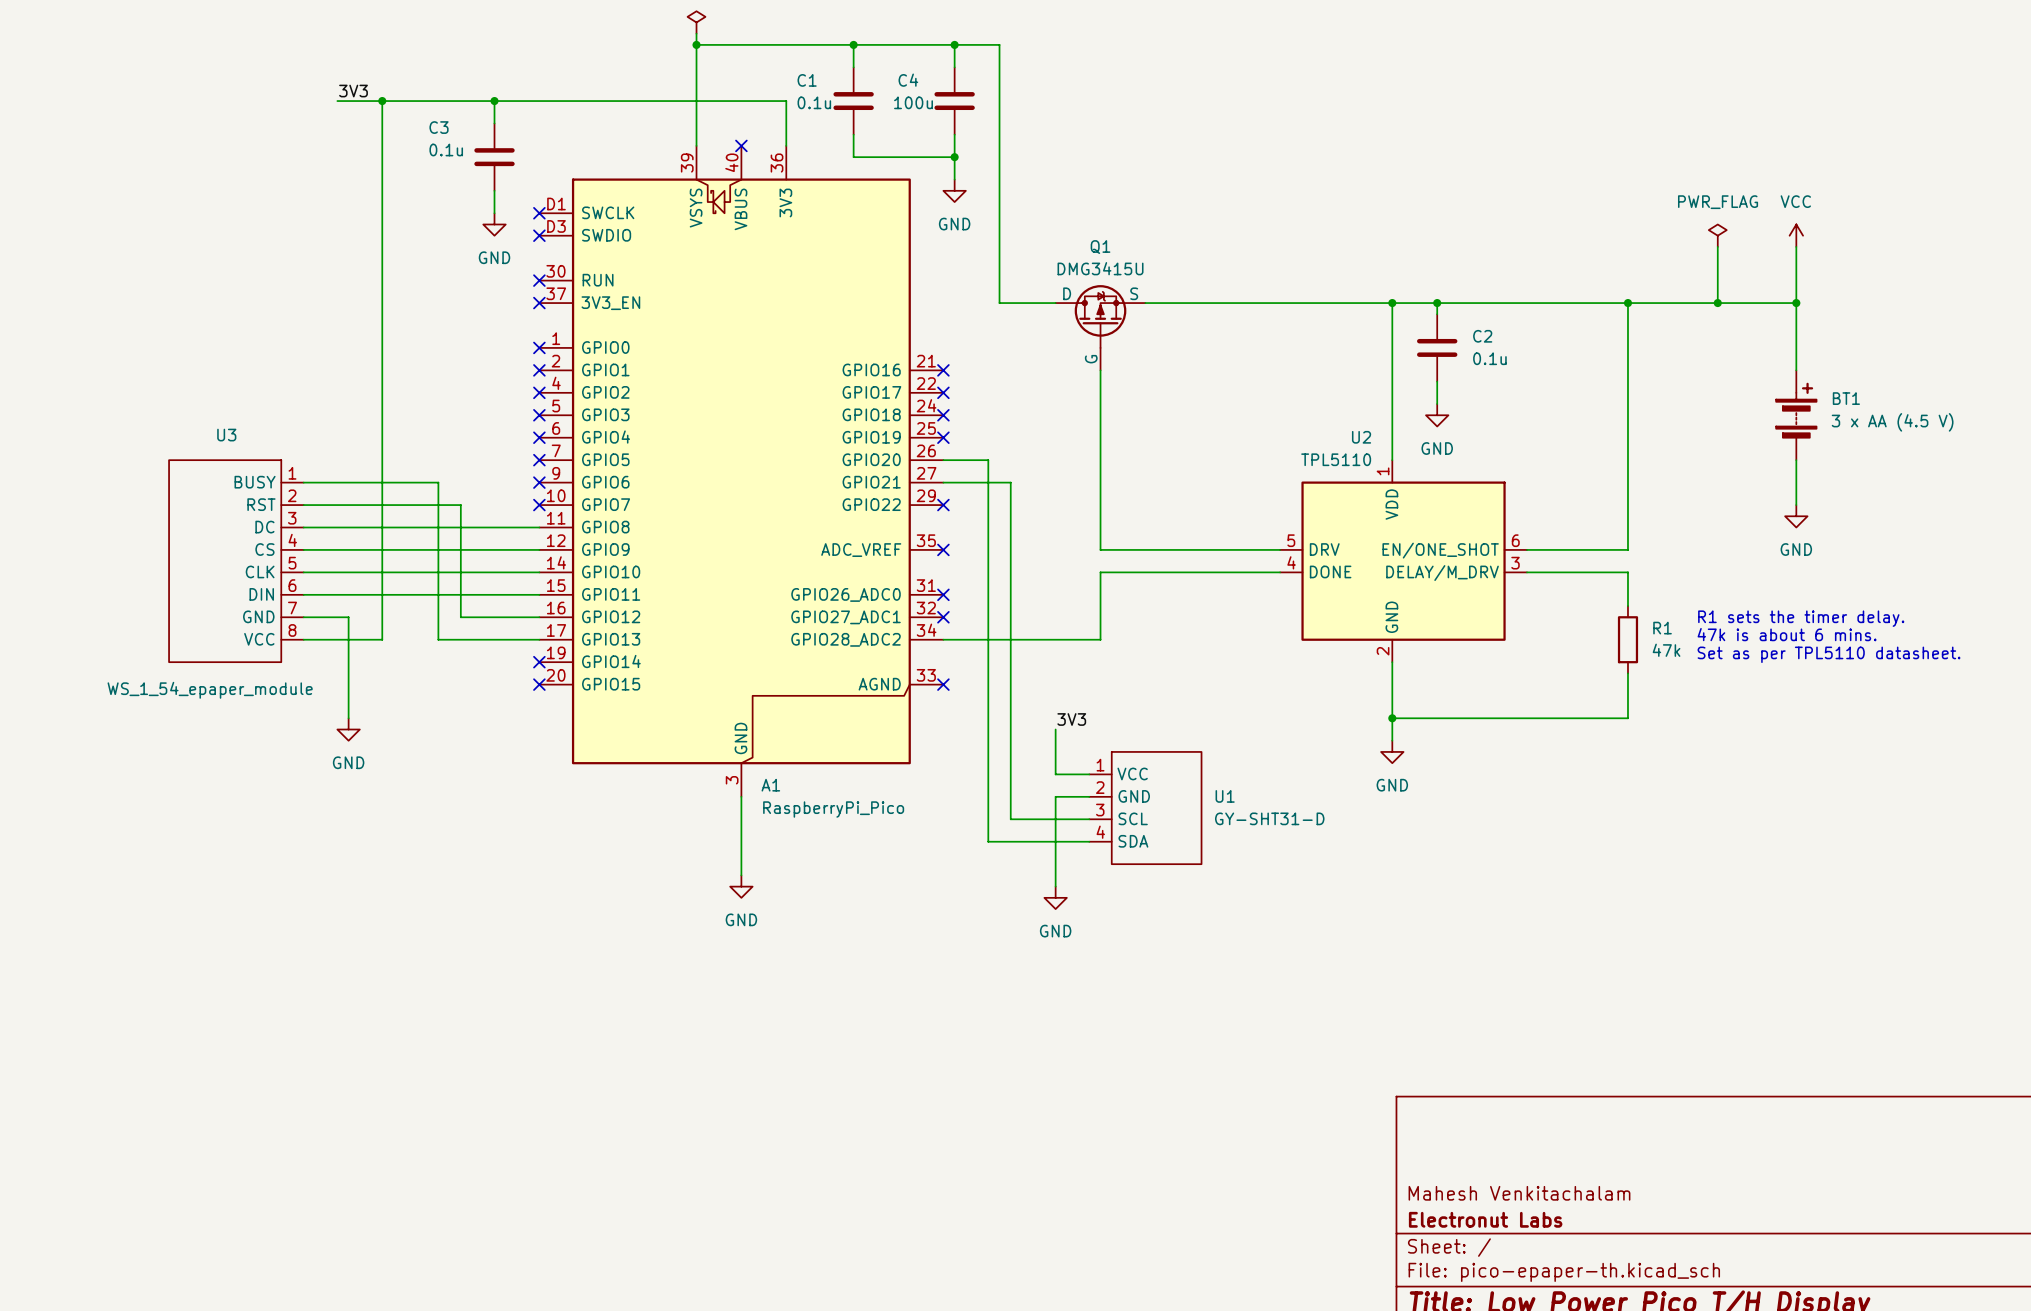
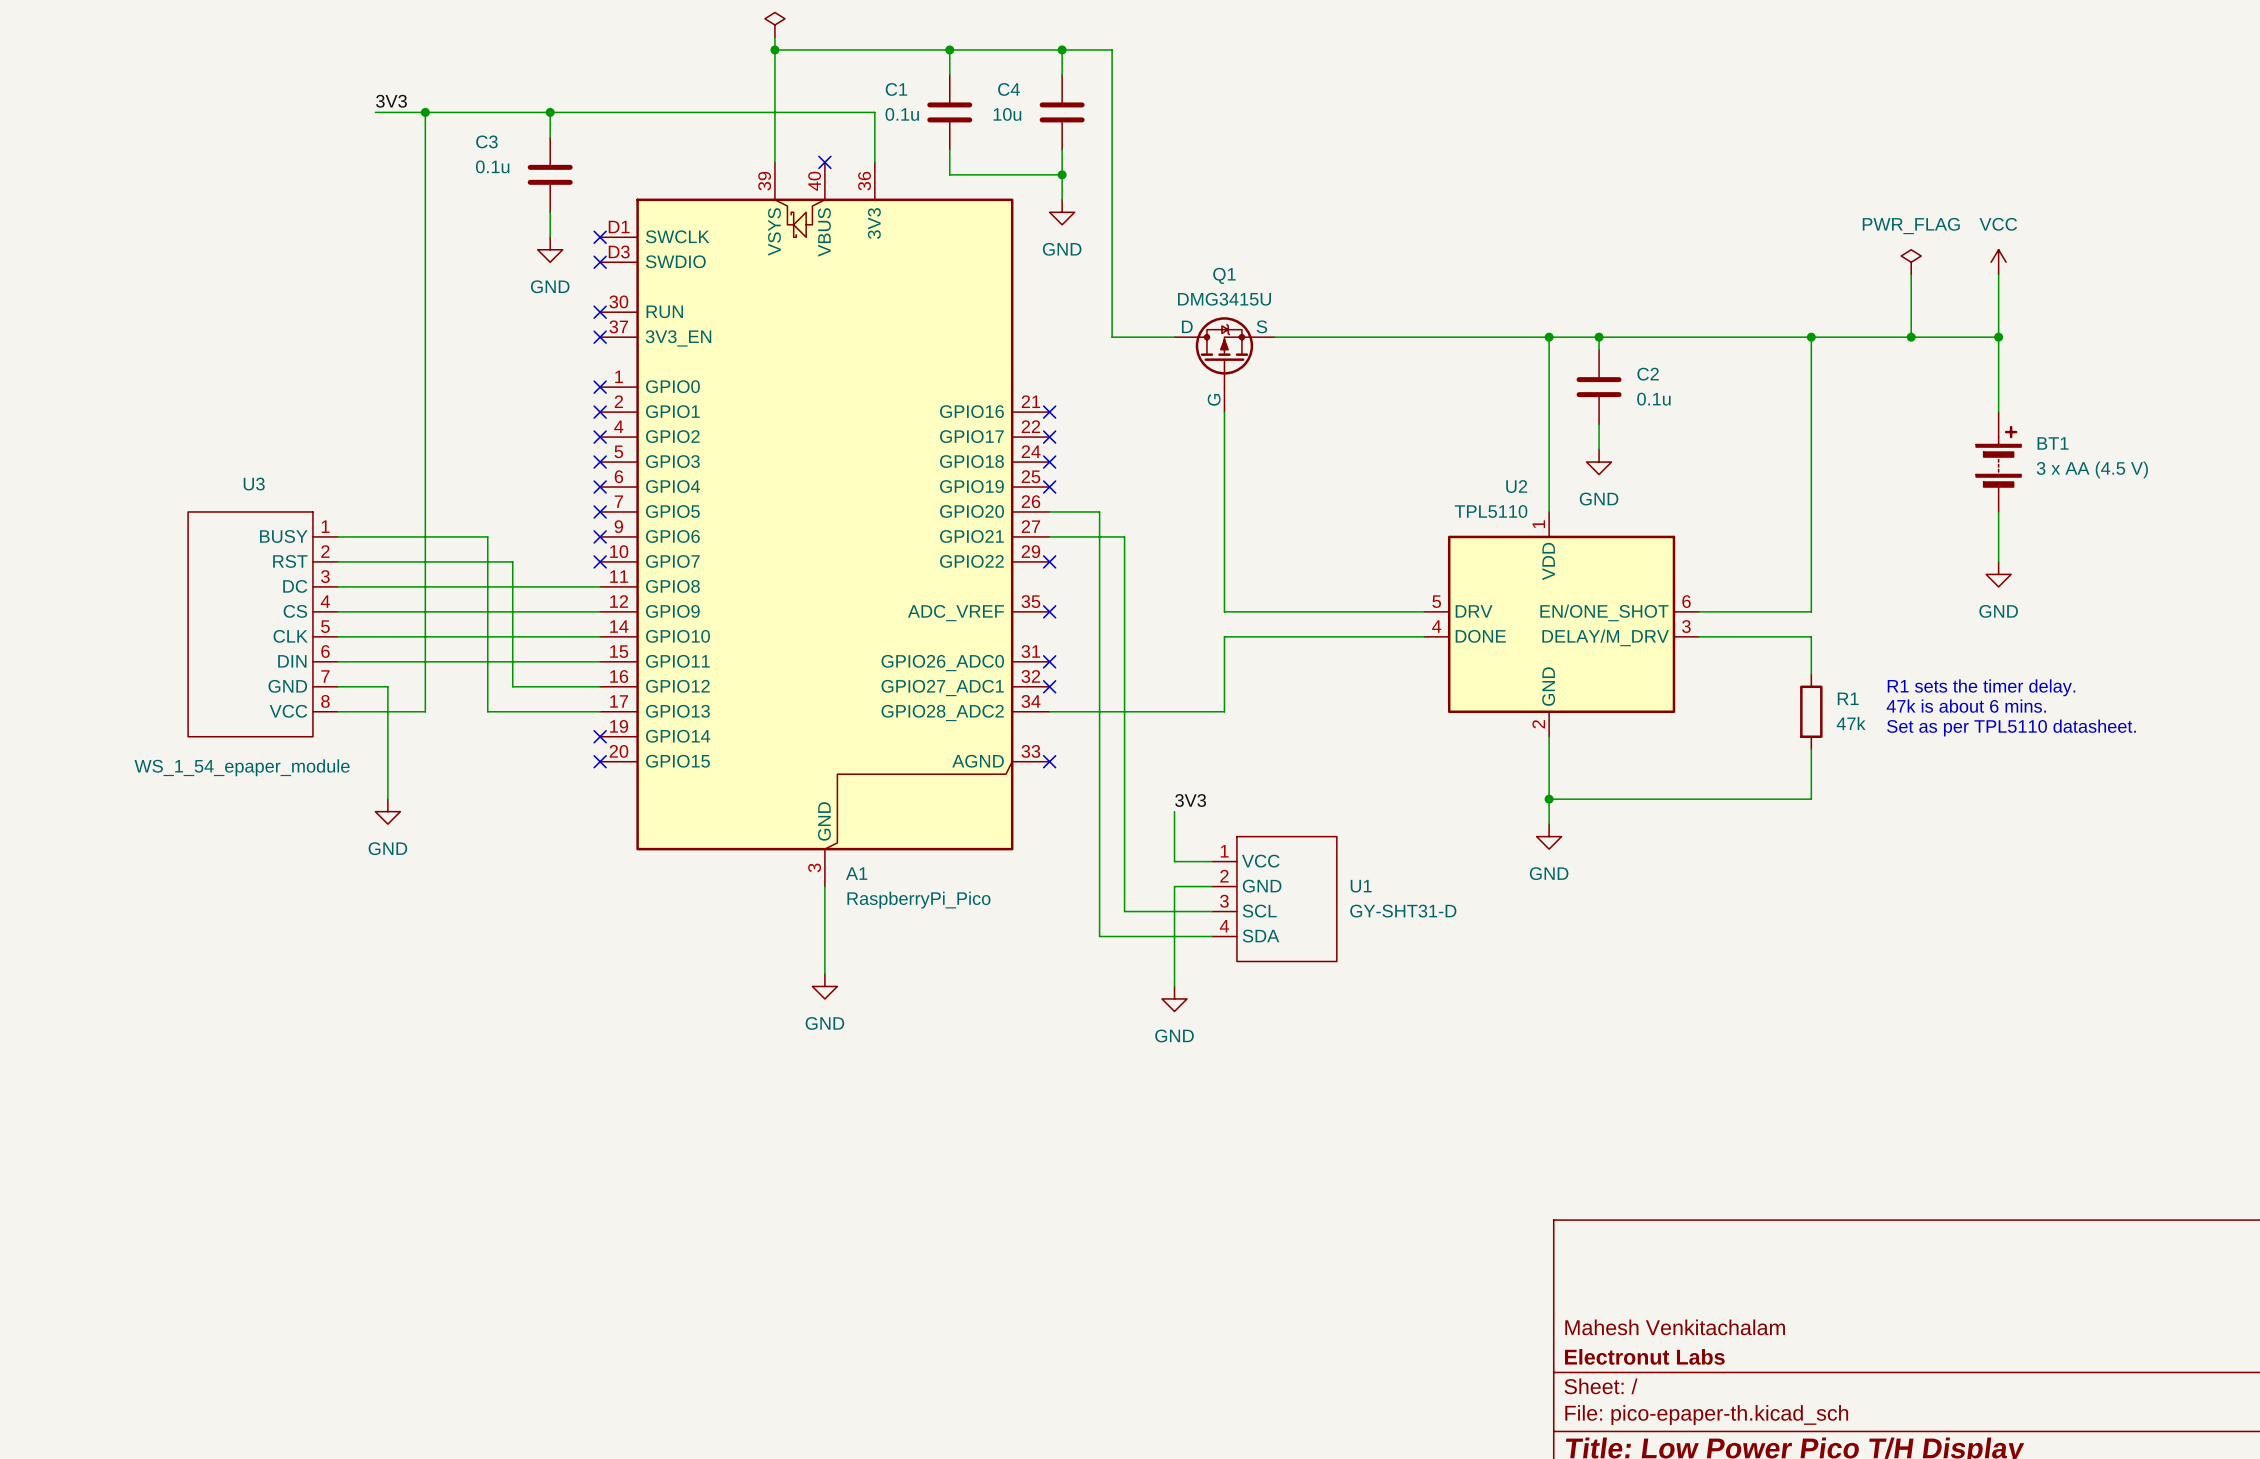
C4 value: 100u (913, 102) -> 10u (1007, 114)

